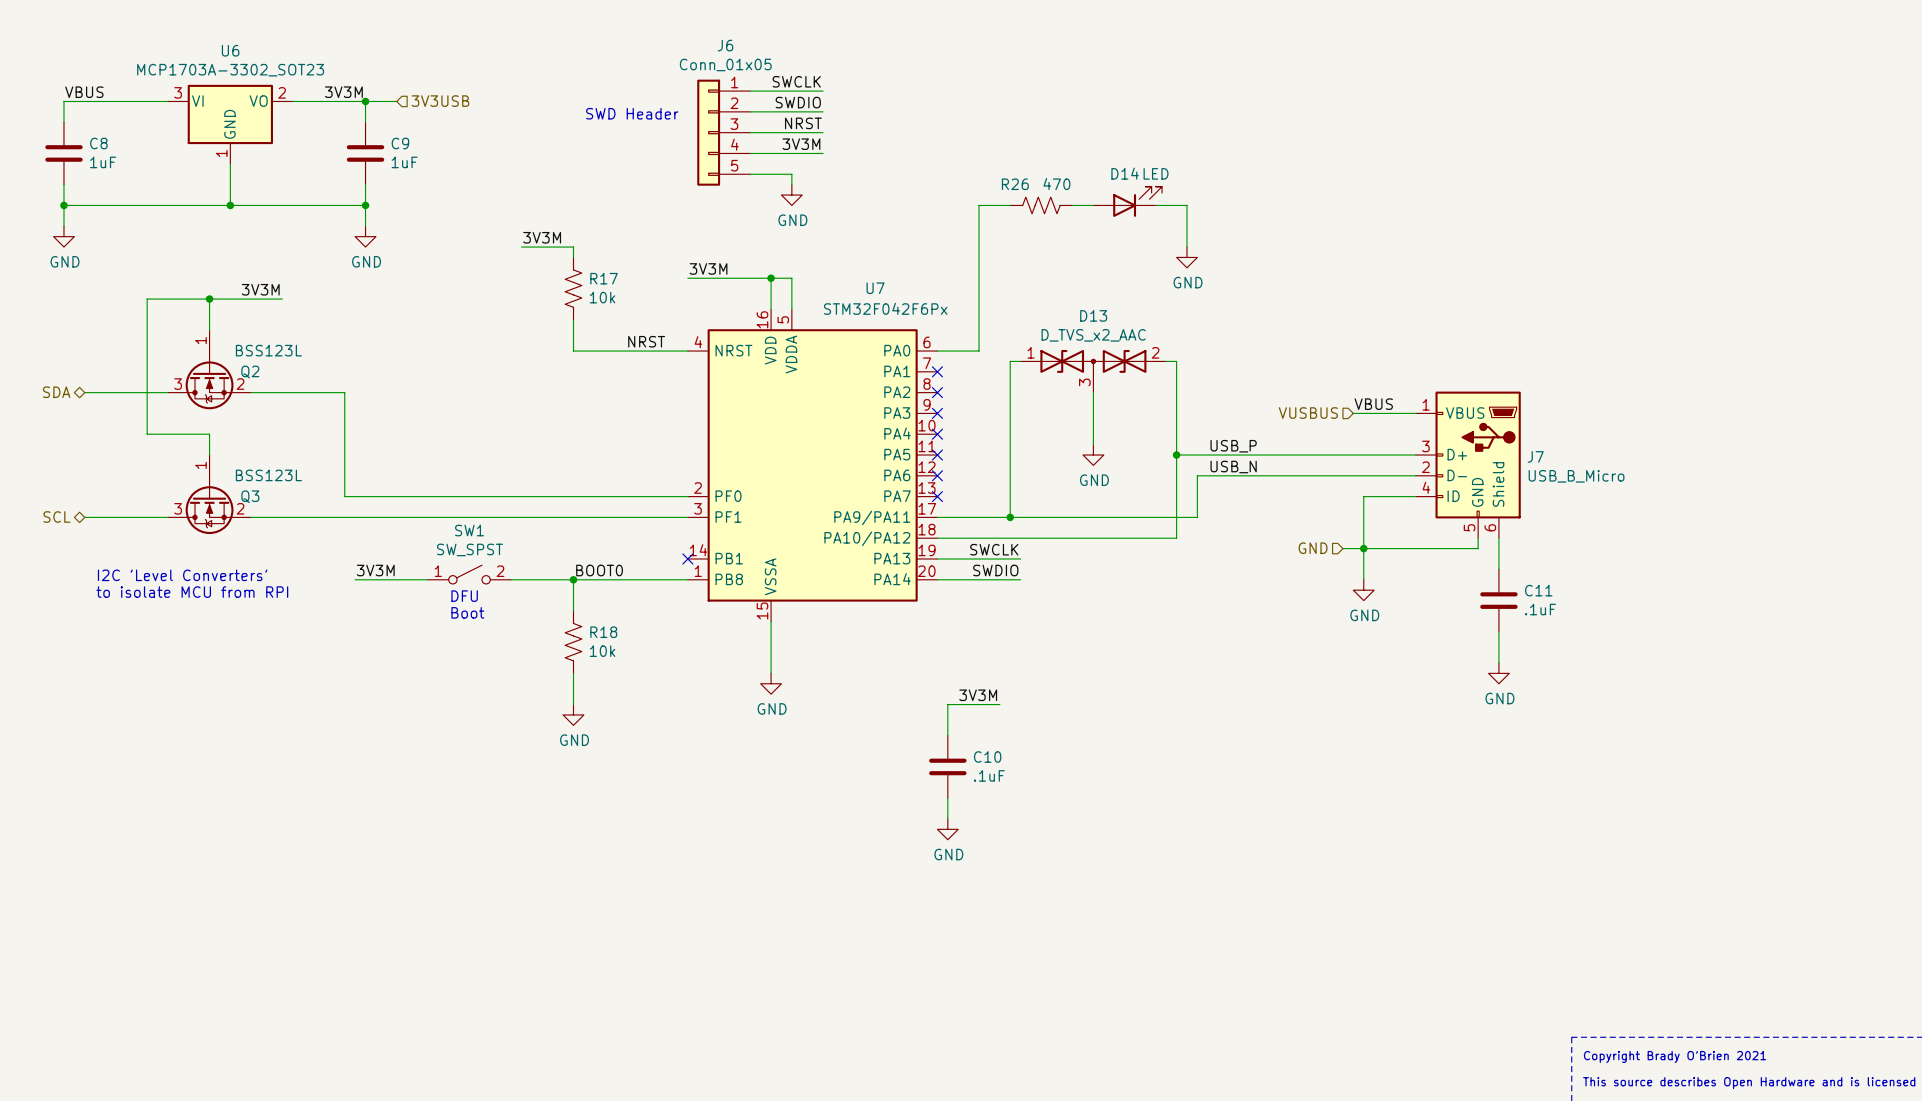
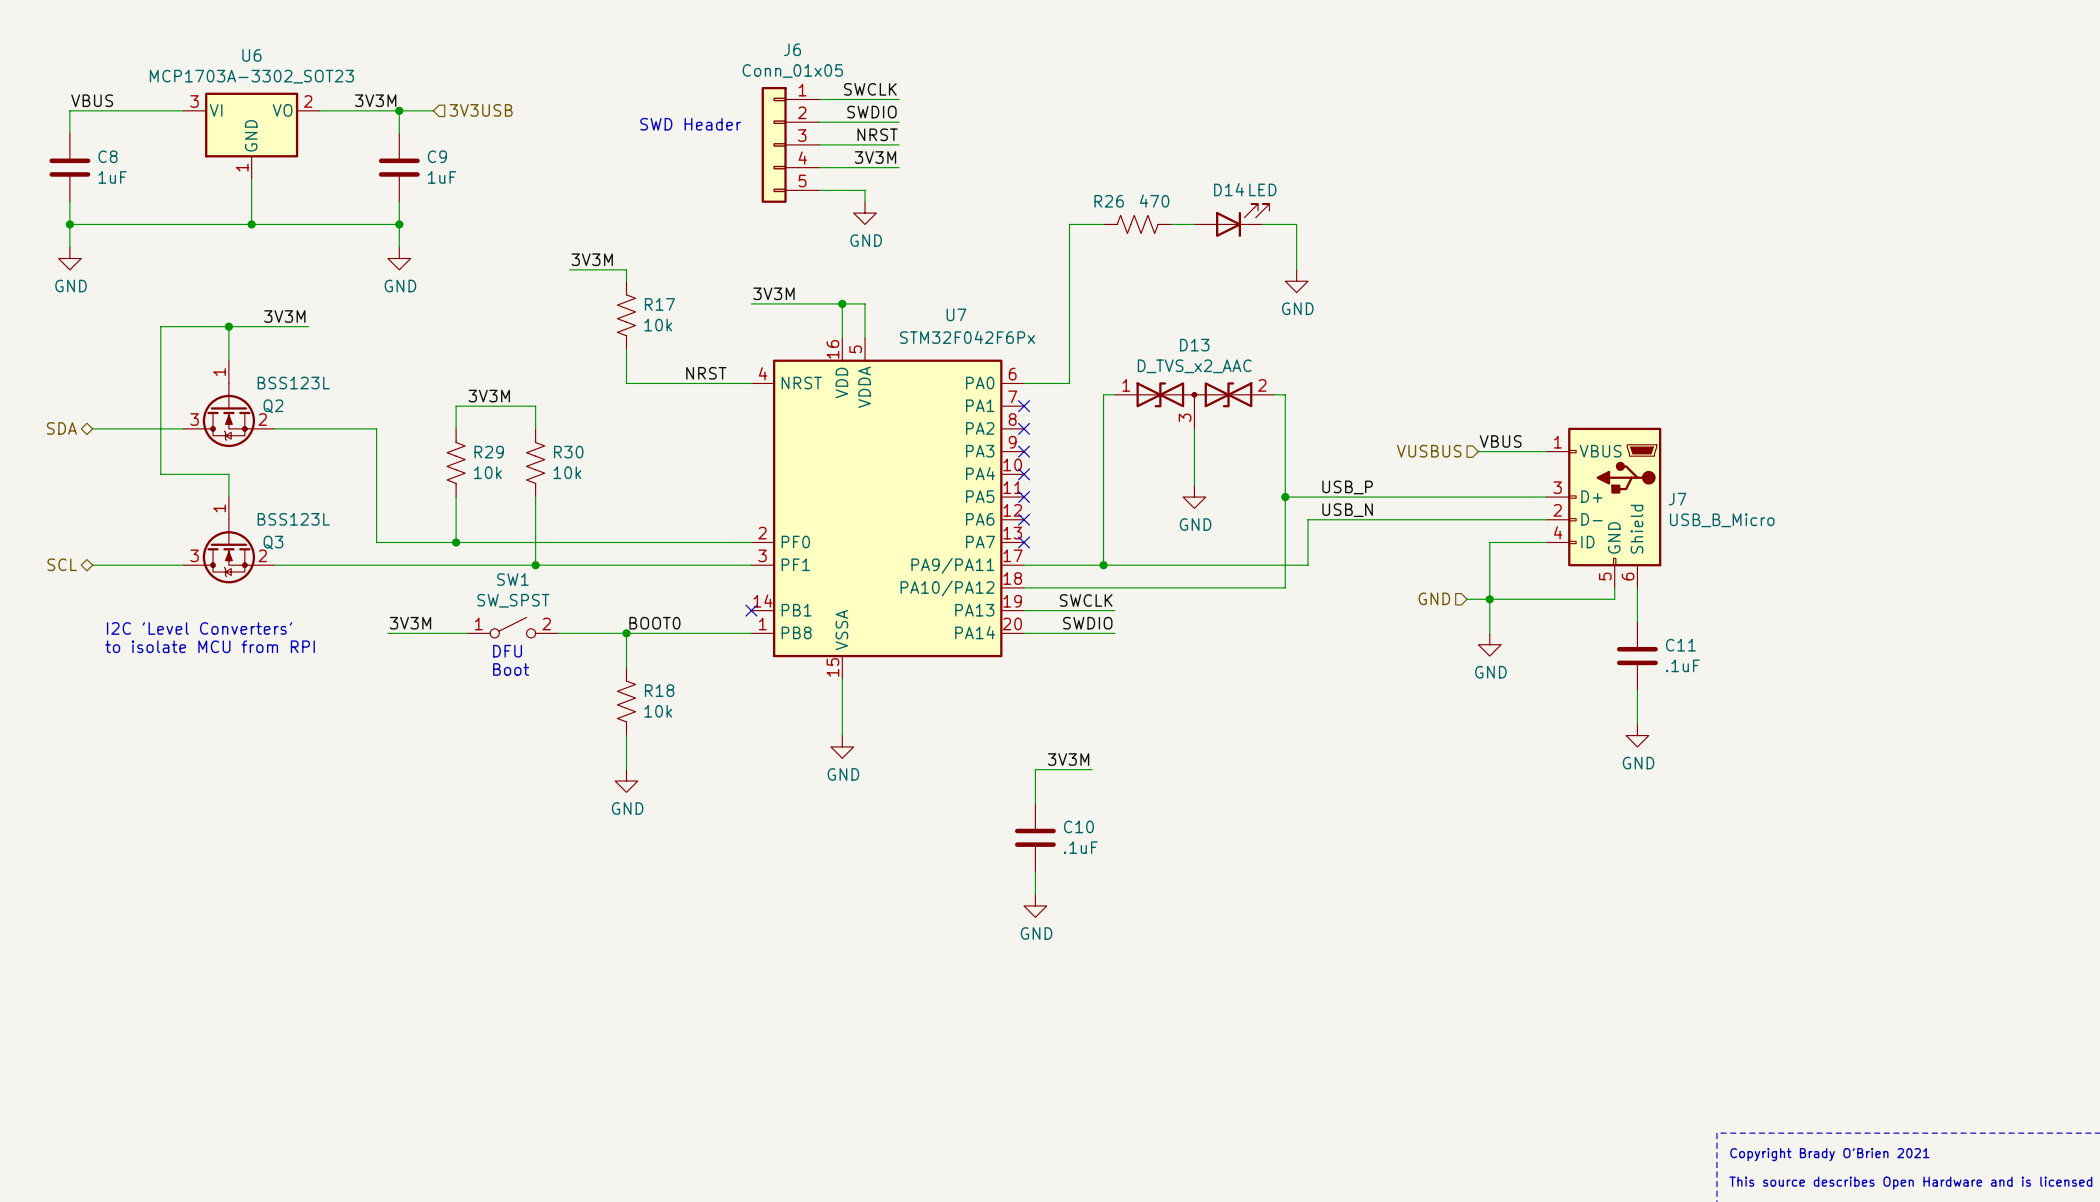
label: none -> 3V3M (489, 396)
wire: none -> (456, 428) (456, 406) (535, 406) (535, 428)
R29: none -> 10k (456, 462)
R30: none -> 10k (535, 462)
wire: none -> (456, 497) (456, 542)
wire: none -> (535, 497) (535, 565)
junction: none -> (456, 542)
junction: none -> (535, 565)

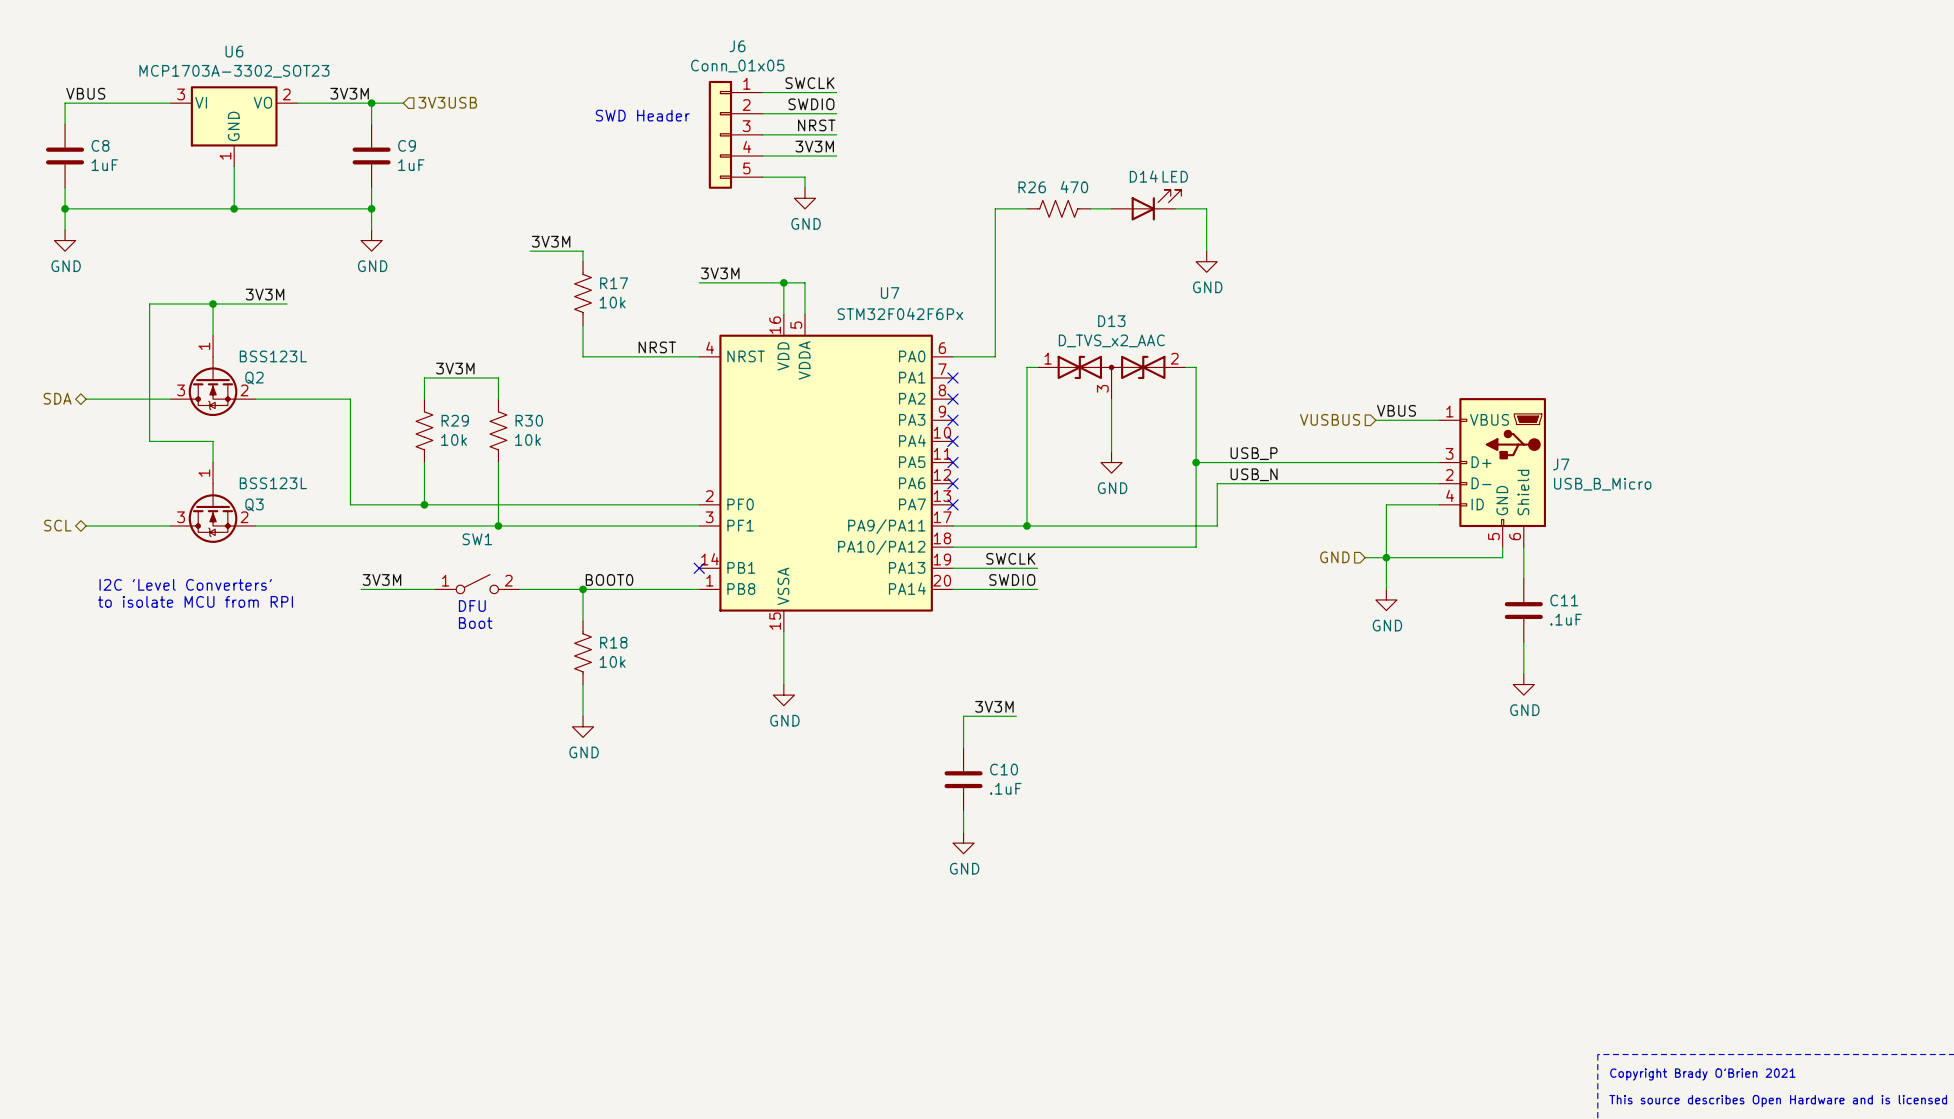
SW1 value: SW_SPST (513, 600) -> none

